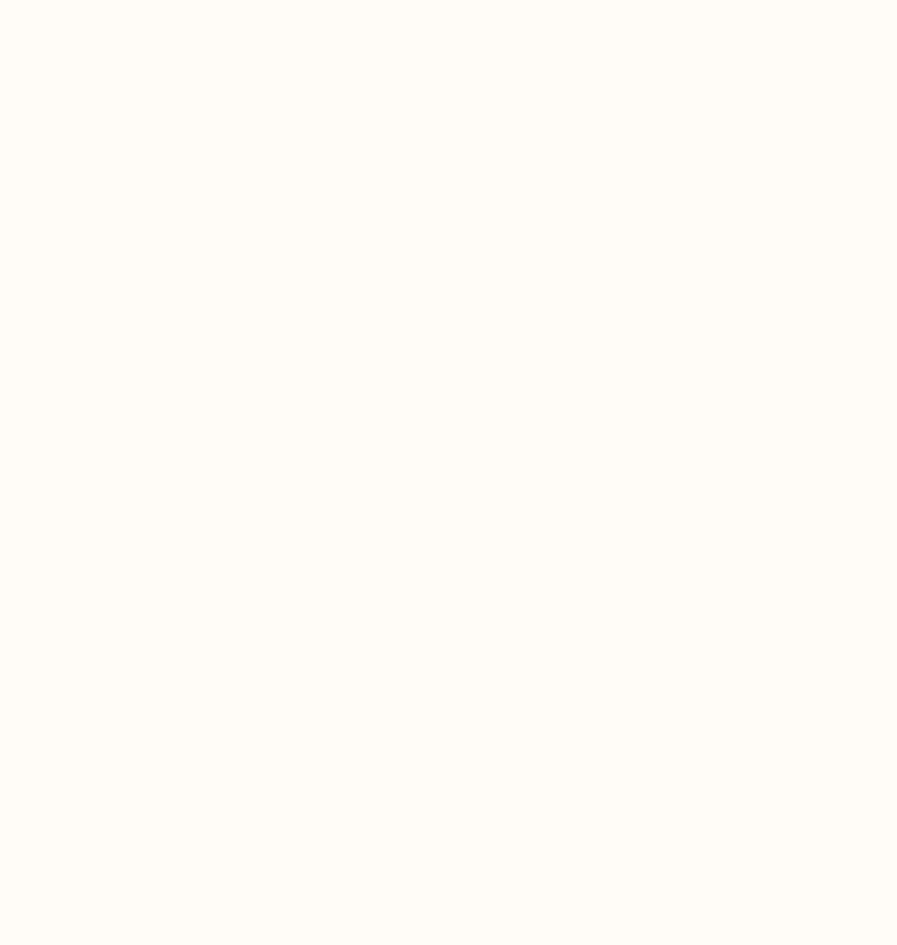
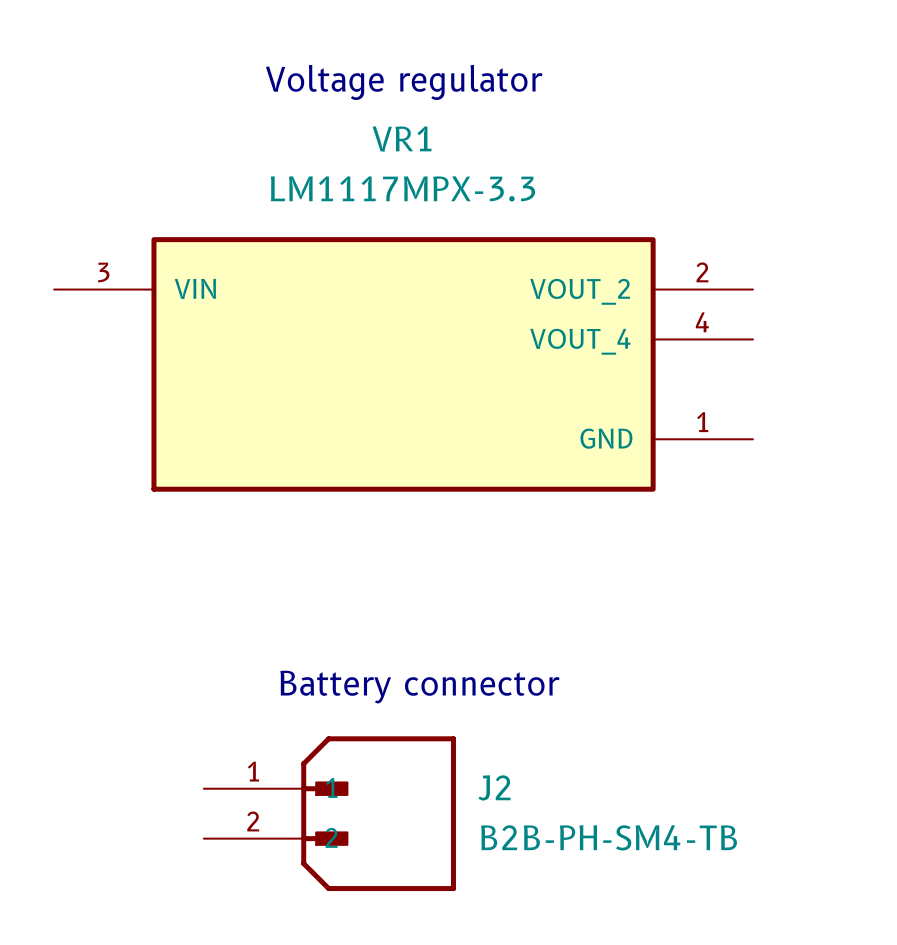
text: none -> Voltage regulator (404, 82)
VR1: none -> LM1117MPX-3.3 (403, 364)
text: none -> Battery connector (419, 687)
J2: none -> B2B-PH-SM4-TB (329, 813)

